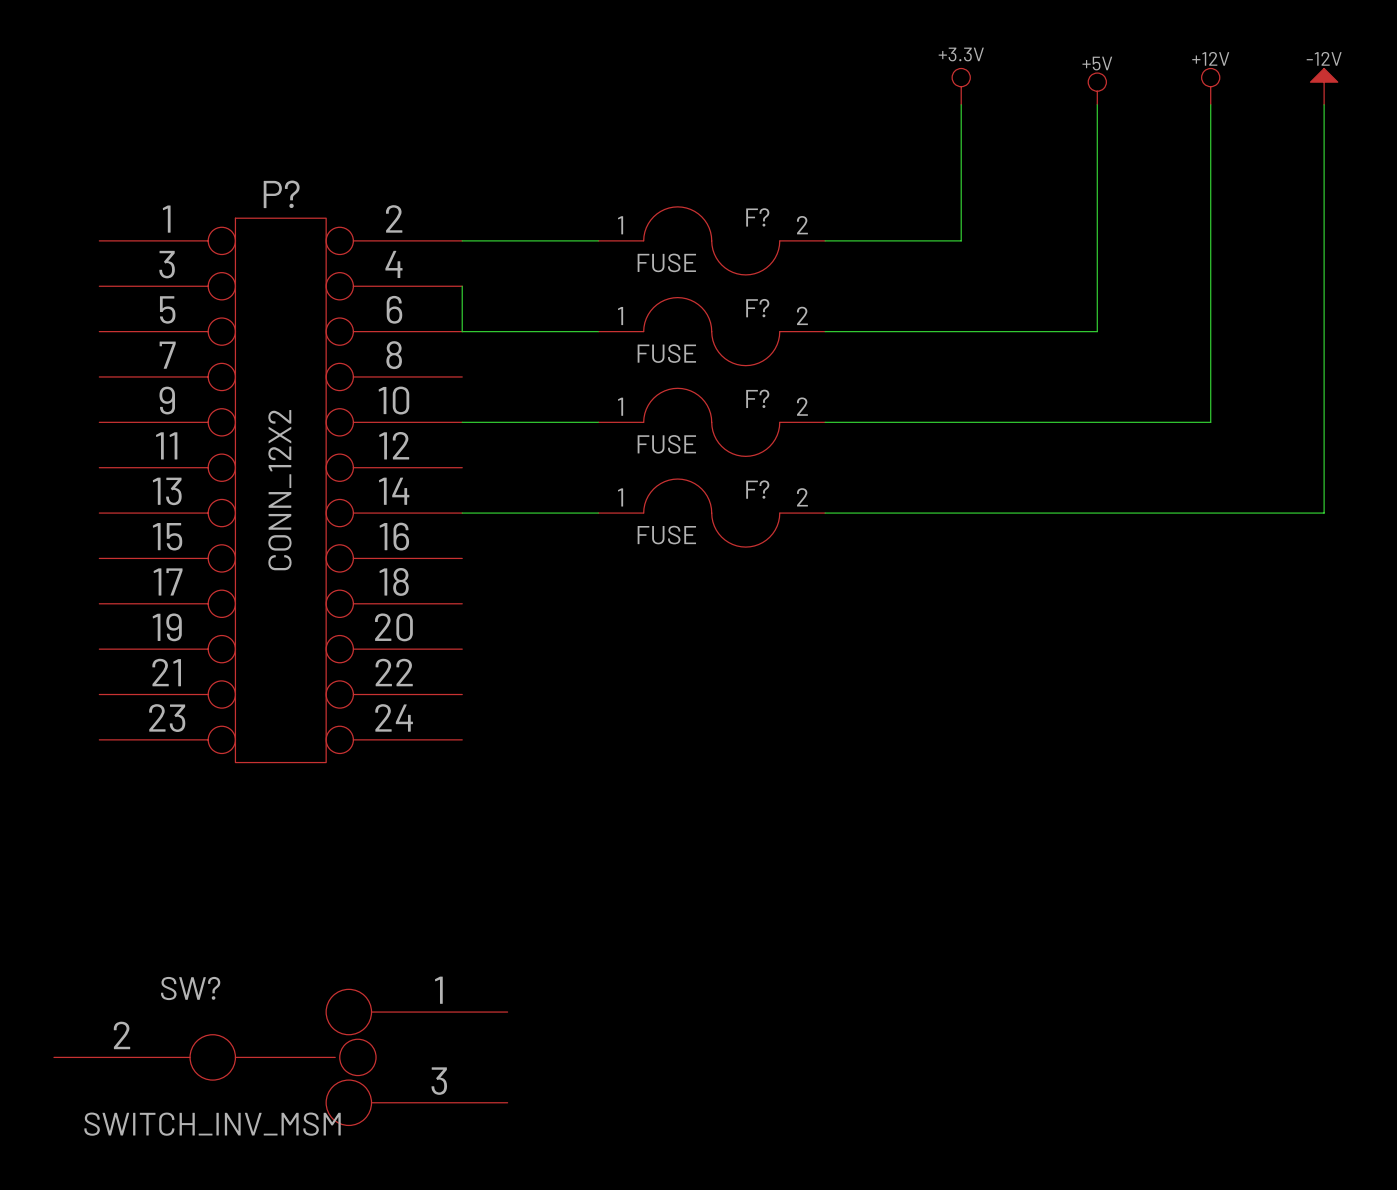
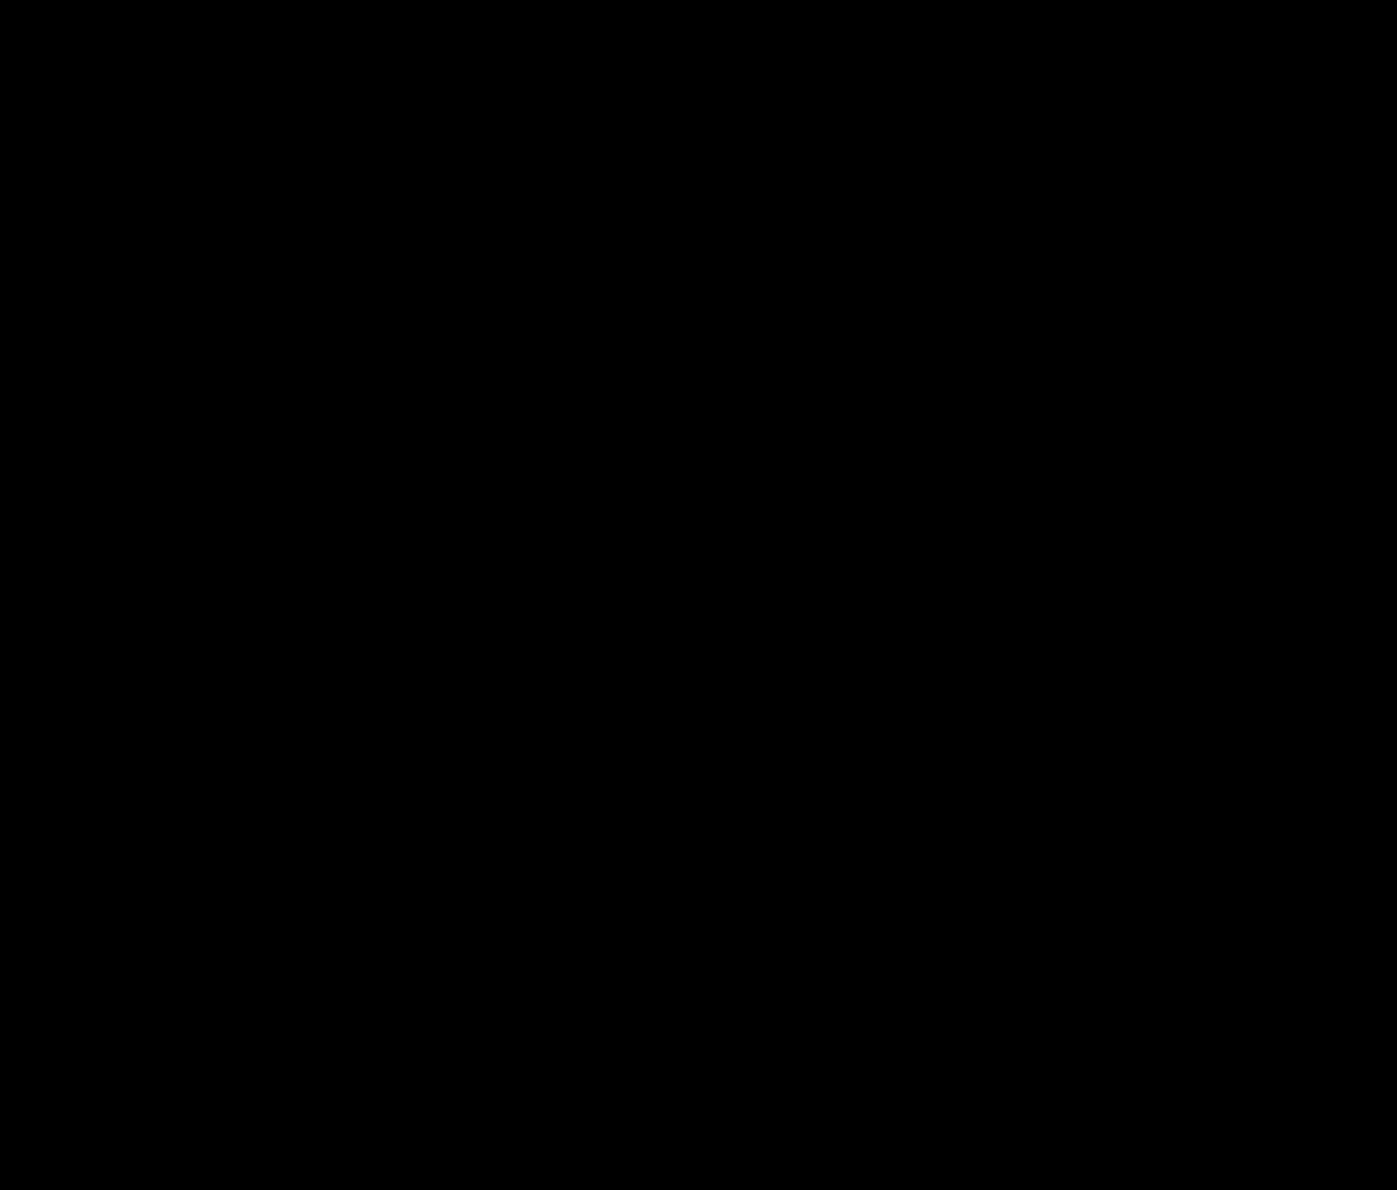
power symbol: +3.3V (961, 86) -> none
power symbol: +12V (1210, 86) -> none
power symbol: -12V (1324, 86) -> none
power symbol: +5V (1097, 88) -> none
wire: (961, 104) (961, 240) (825, 240) -> none
wire: (1097, 104) (1097, 331) (825, 331) -> none
wire: (1210, 104) (1210, 422) (825, 422) -> none
wire: (1324, 104) (1324, 513) (825, 513) -> none
wire: (462, 240) (598, 240) -> none
F?: FUSE (711, 240) -> none
wire: (462, 286) (462, 331) (598, 331) -> none
F?: FUSE (711, 331) -> none
wire: (462, 422) (598, 422) -> none
F?: FUSE (711, 422) -> none
P?: CONN_12X2 (280, 490) -> none
wire: (462, 513) (598, 513) -> none
F?: FUSE (711, 513) -> none
SW?: SWITCH_INV_MSM (280, 1057) -> none

